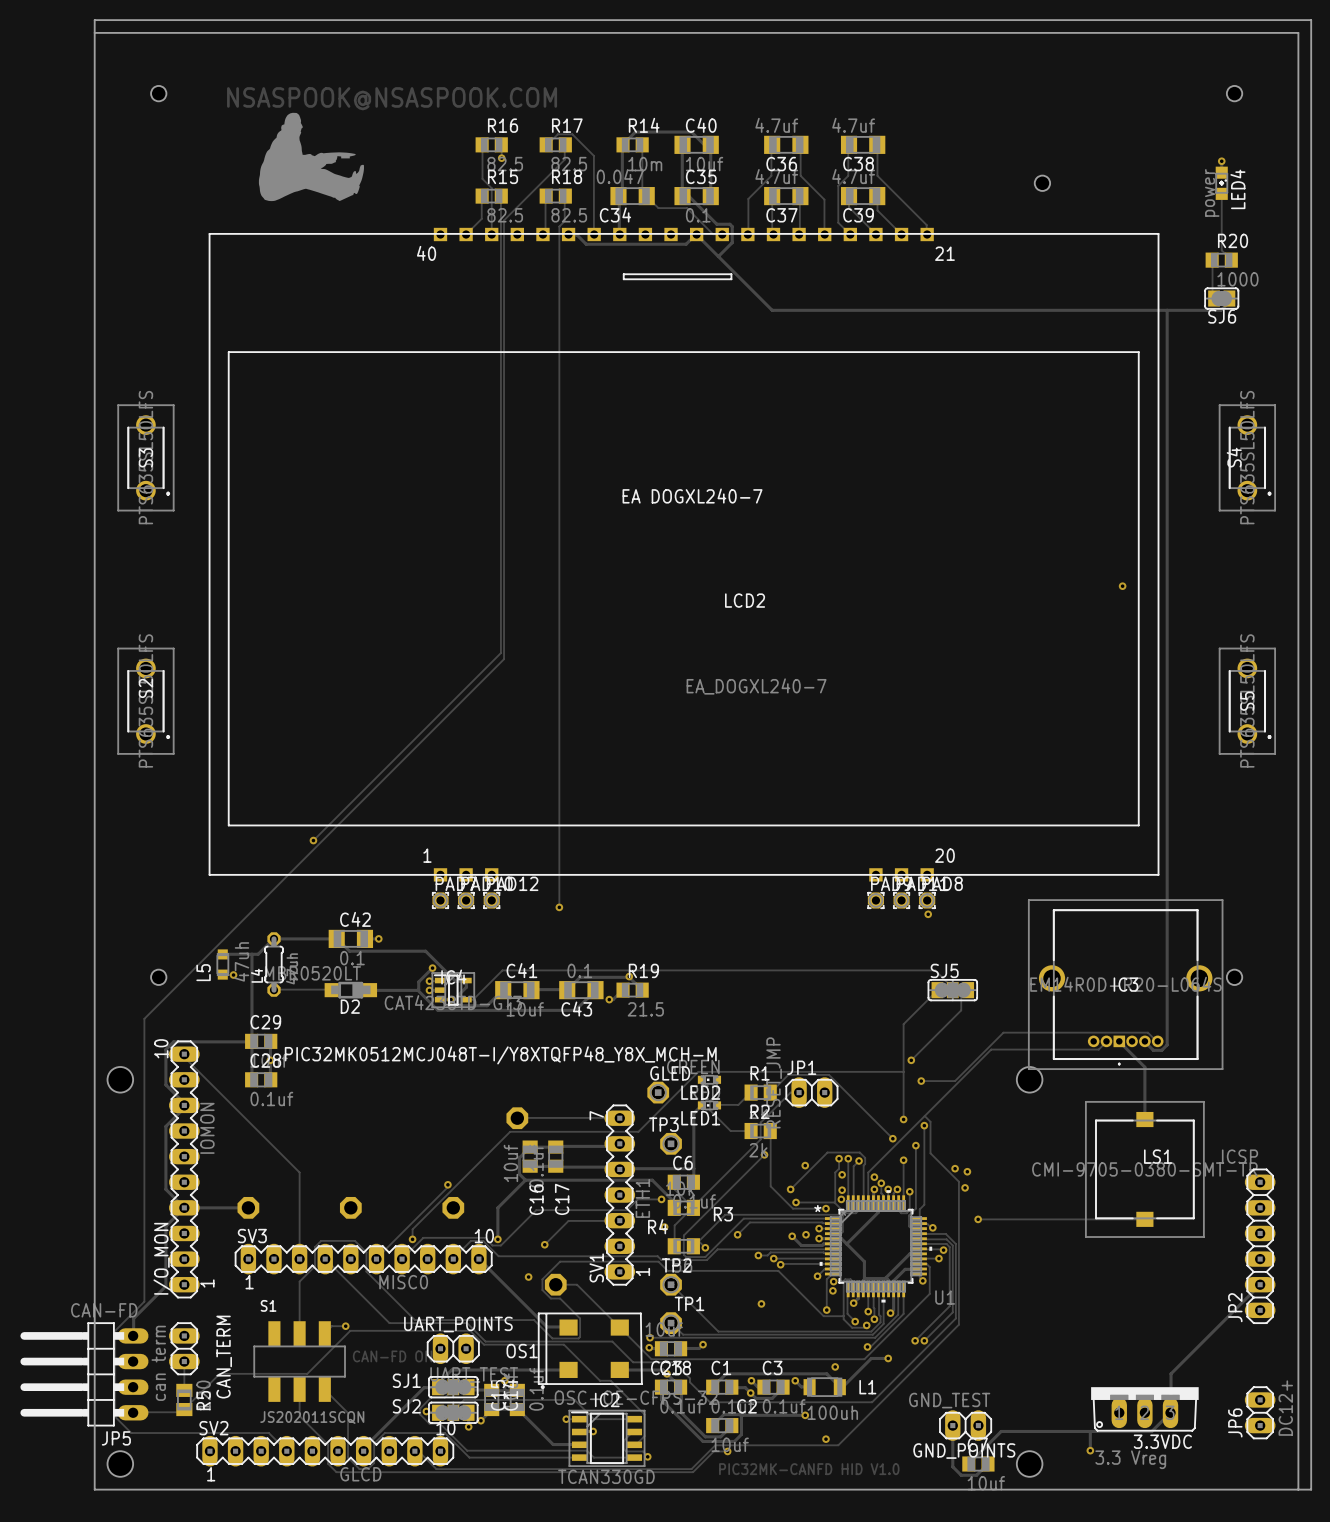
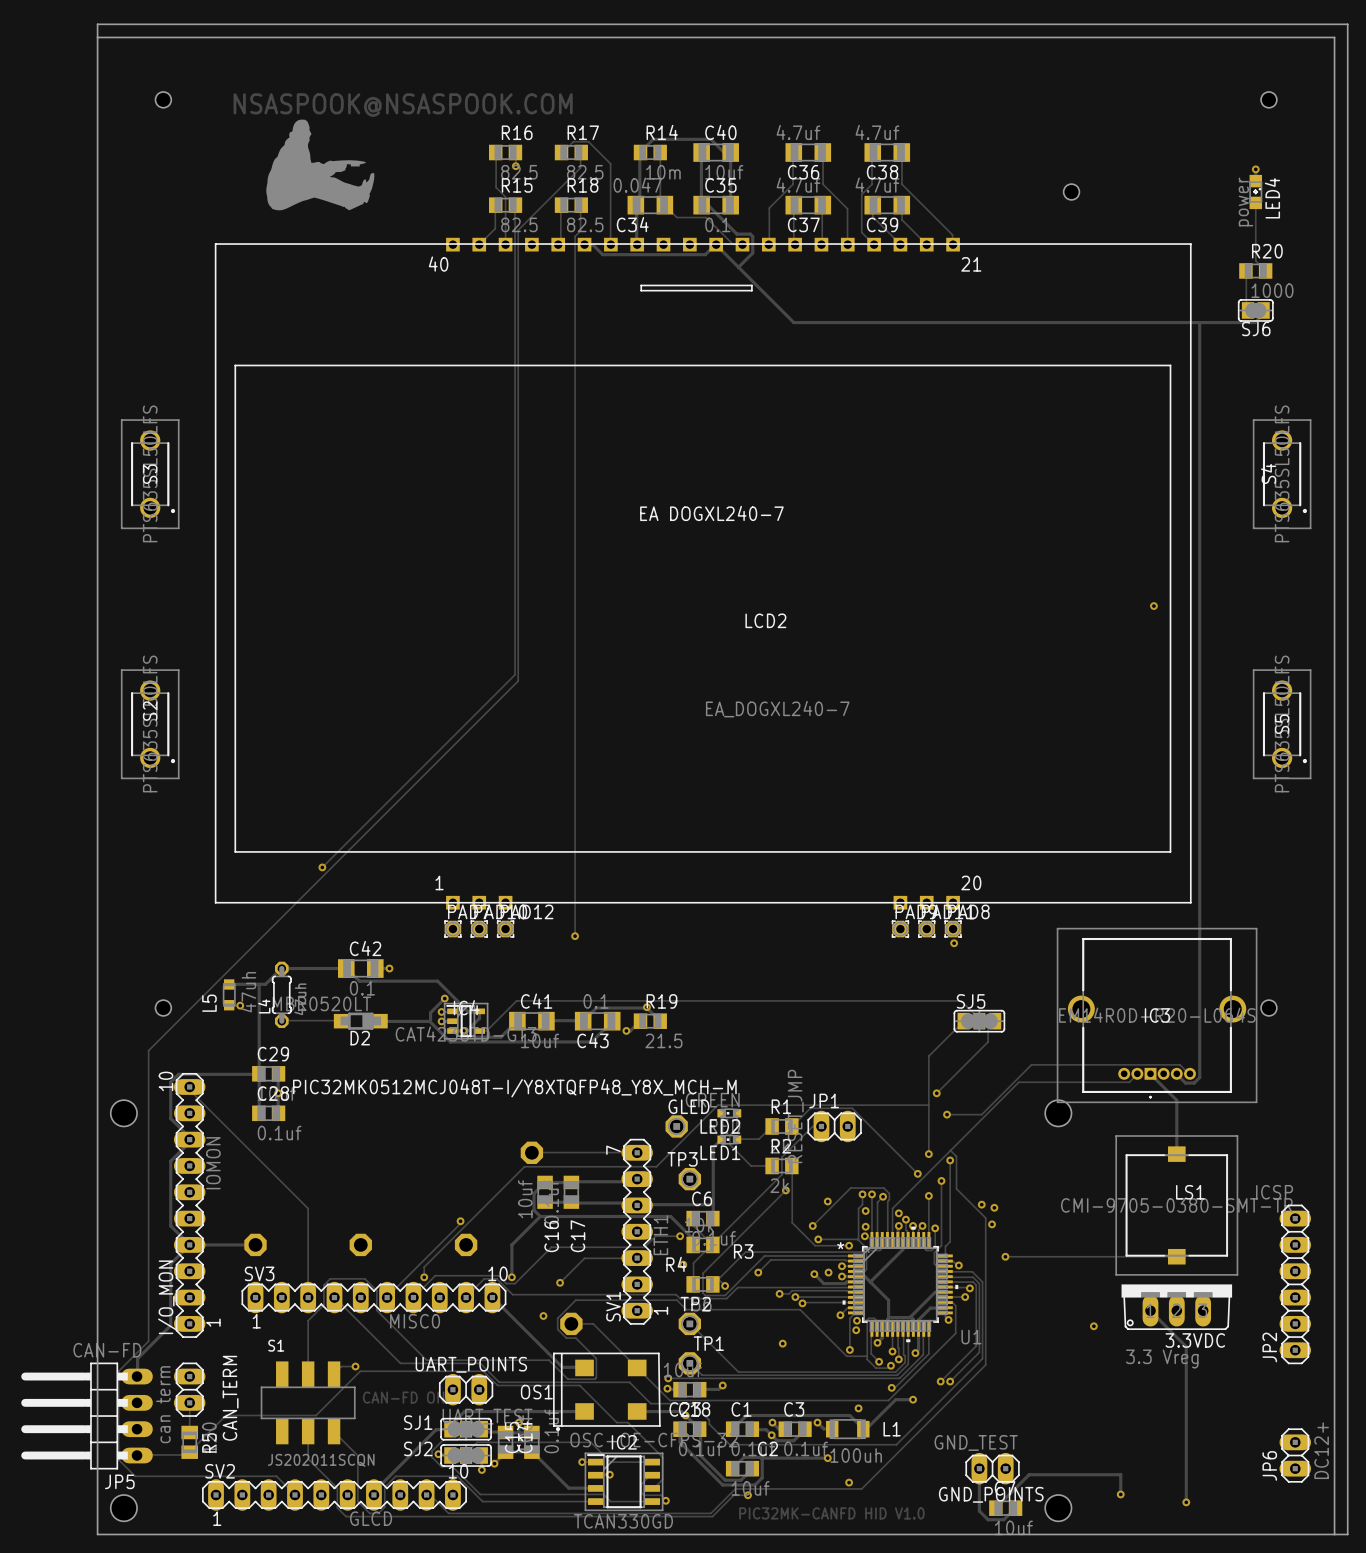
track: none -> (1150, 1310) (1186, 1346) (1186, 1502)
track: (1260, 1284) (1171, 1373) (1171, 1411) (1151, 1431) (1090, 1431) -> none
via: none -> (1093, 1326)
3.3VDC position: (1144, 1409) -> (1176, 1307)
via: none -> (1186, 1502)

